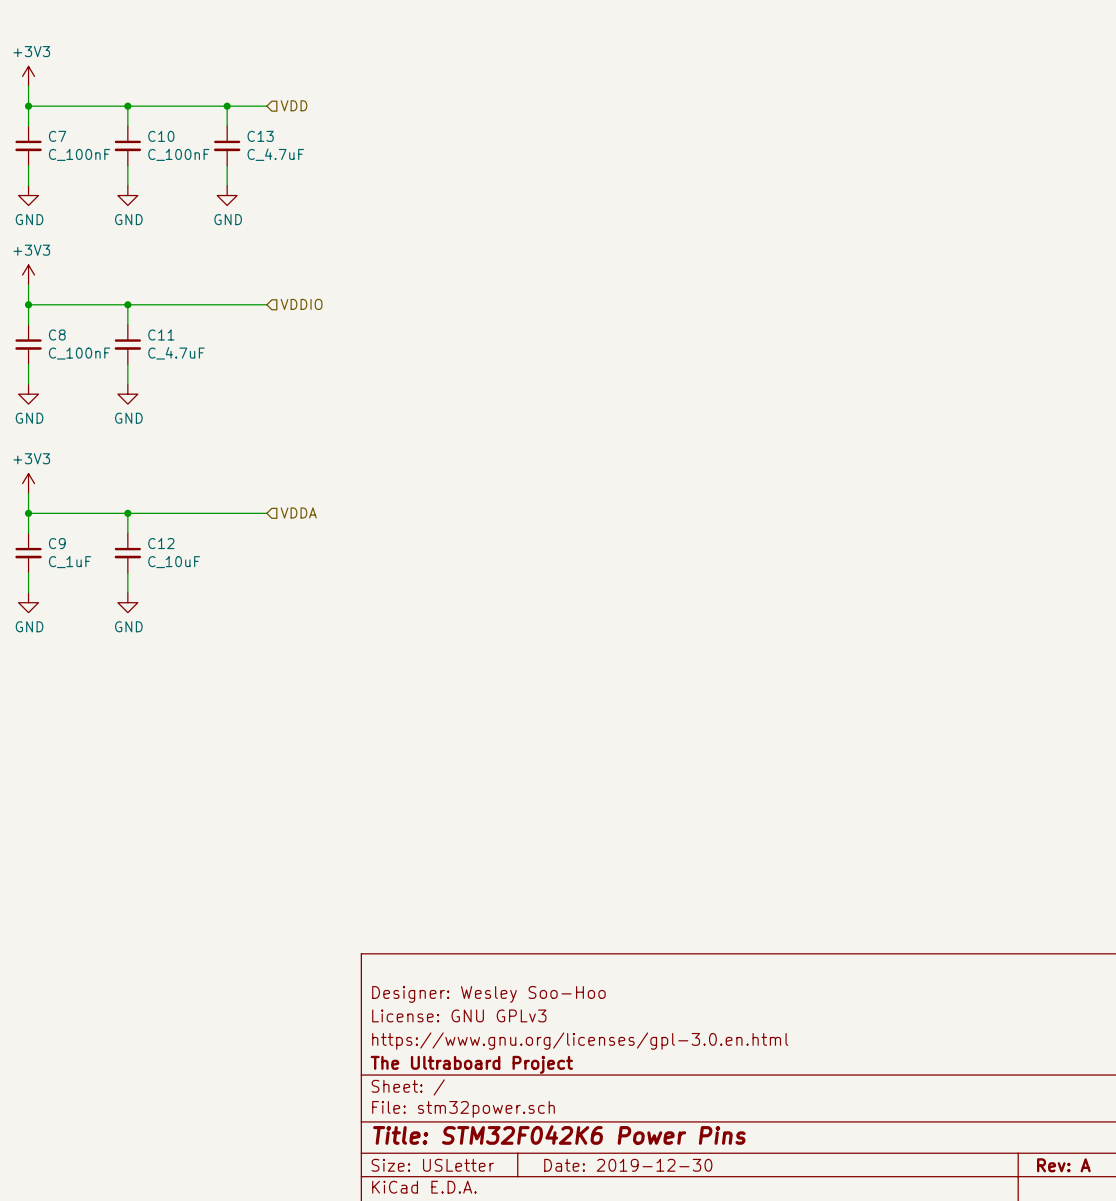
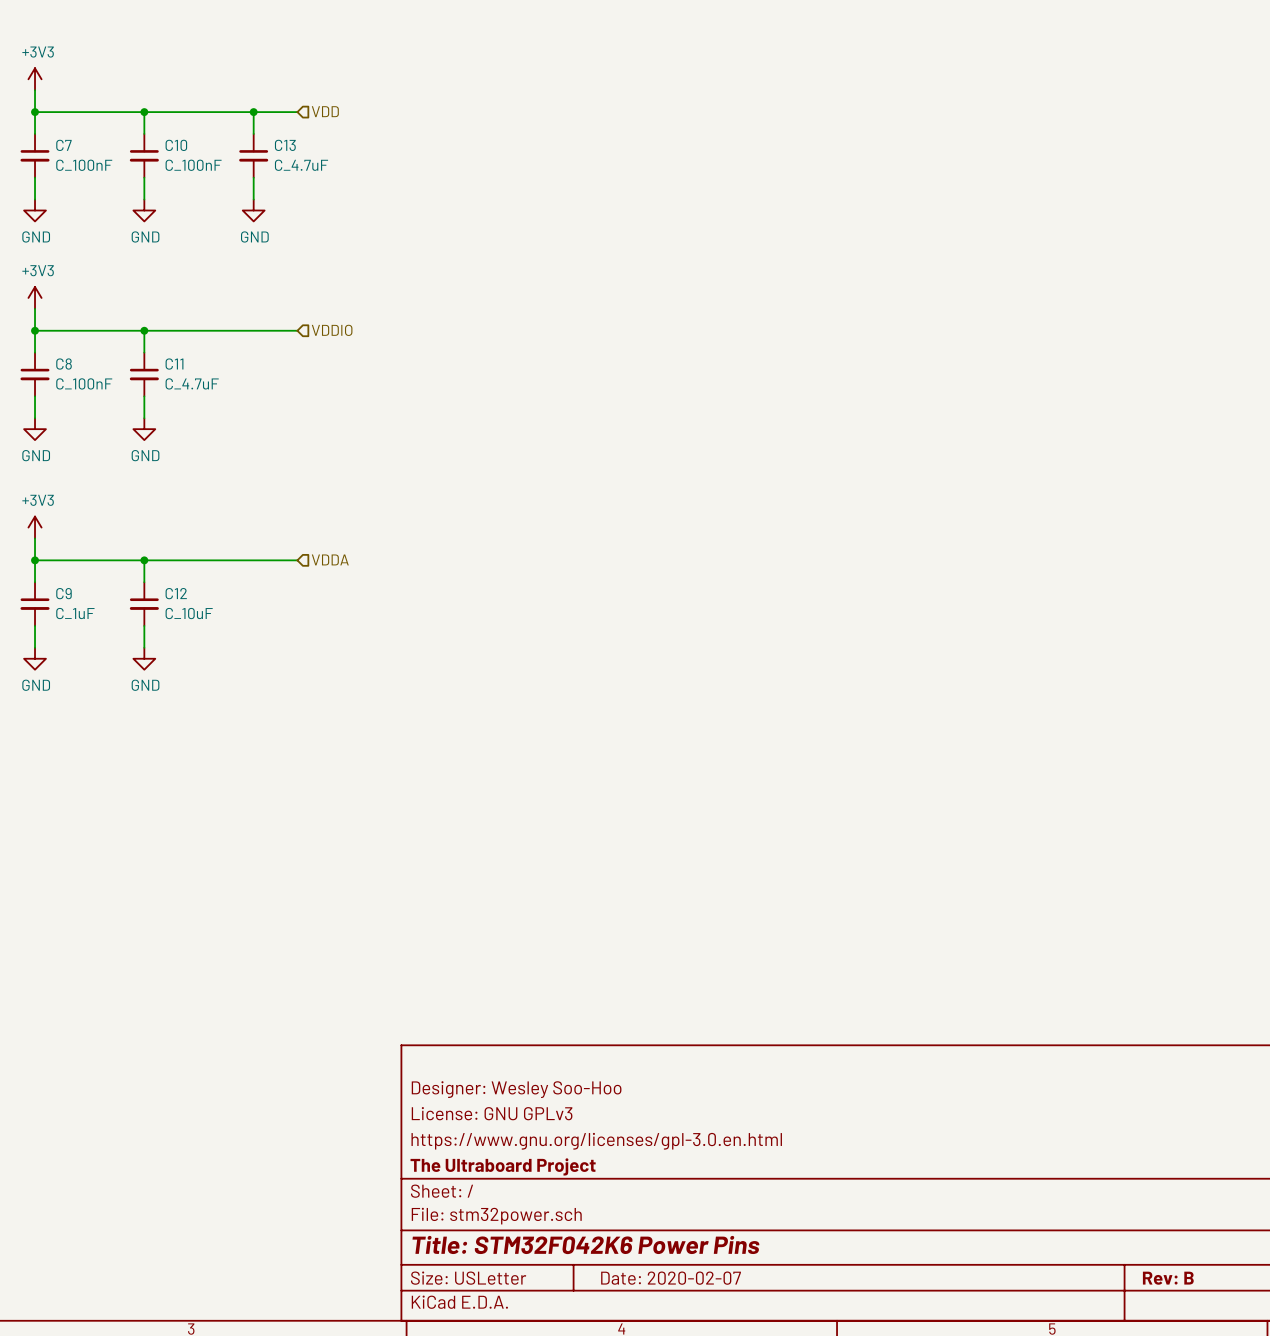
title block: Date: 2019-12-30 (628, 1165) -> Date: 2020-02-07 (671, 1278)
title block: Rev: A (1063, 1165) -> Rev: B (1168, 1278)

